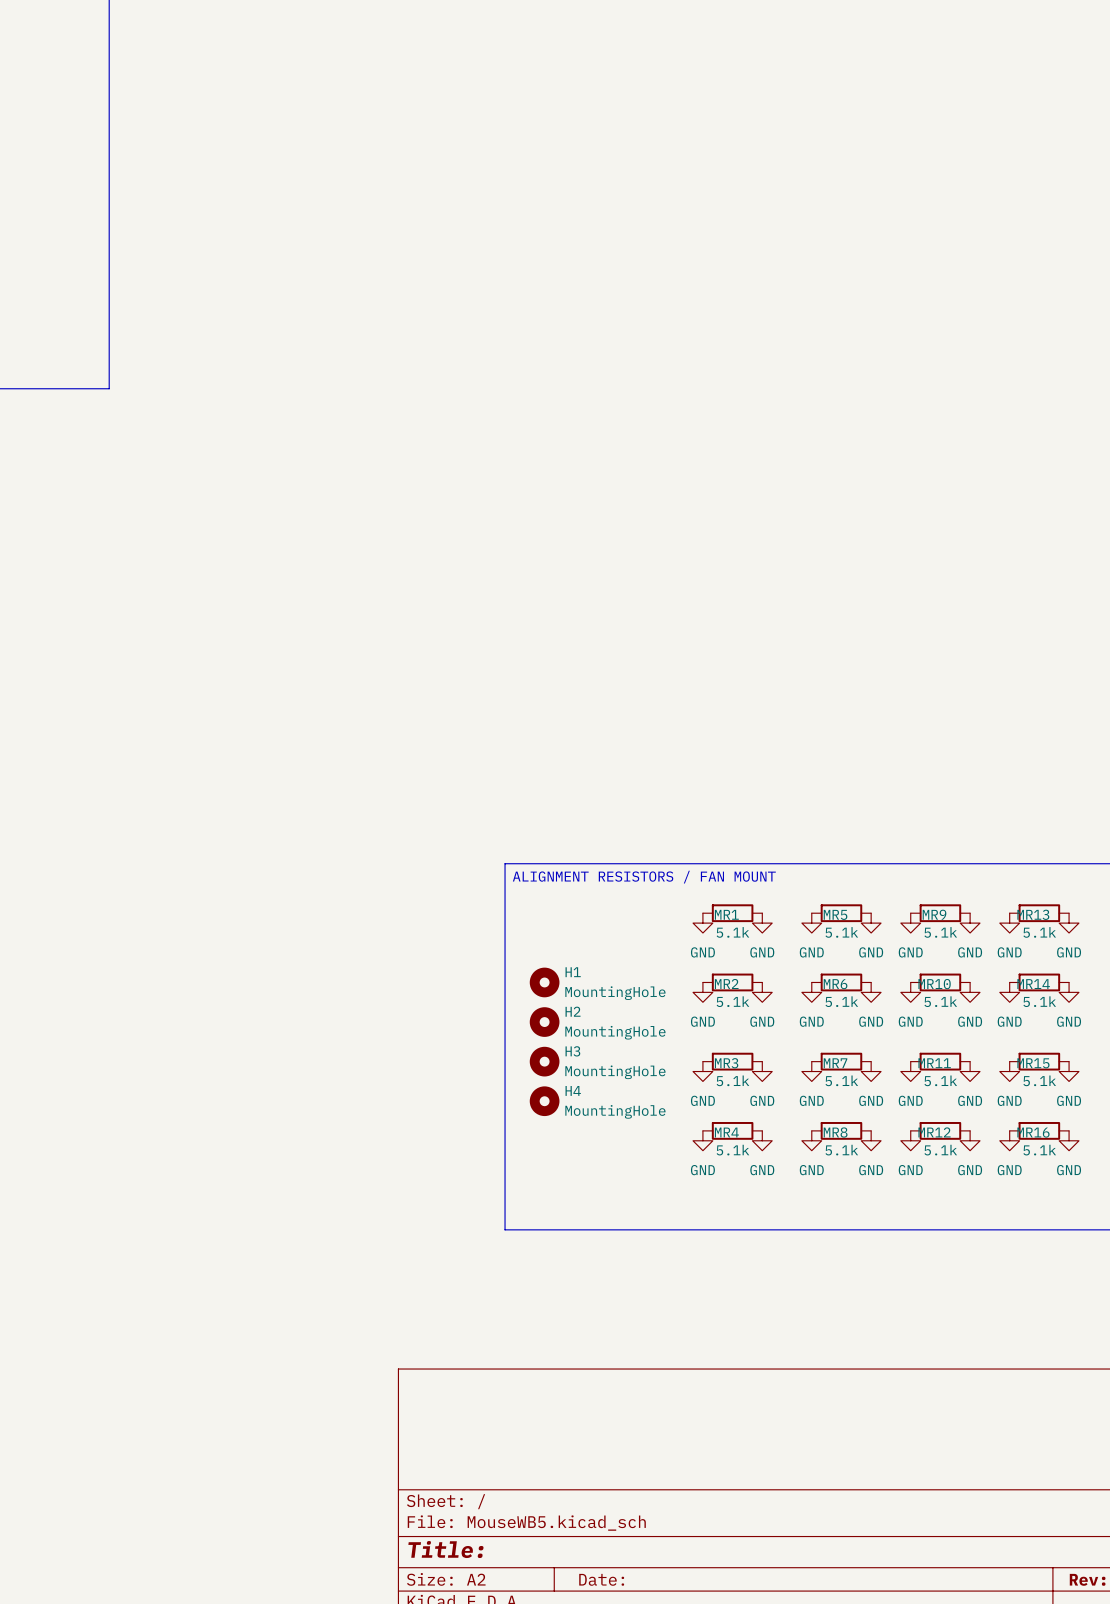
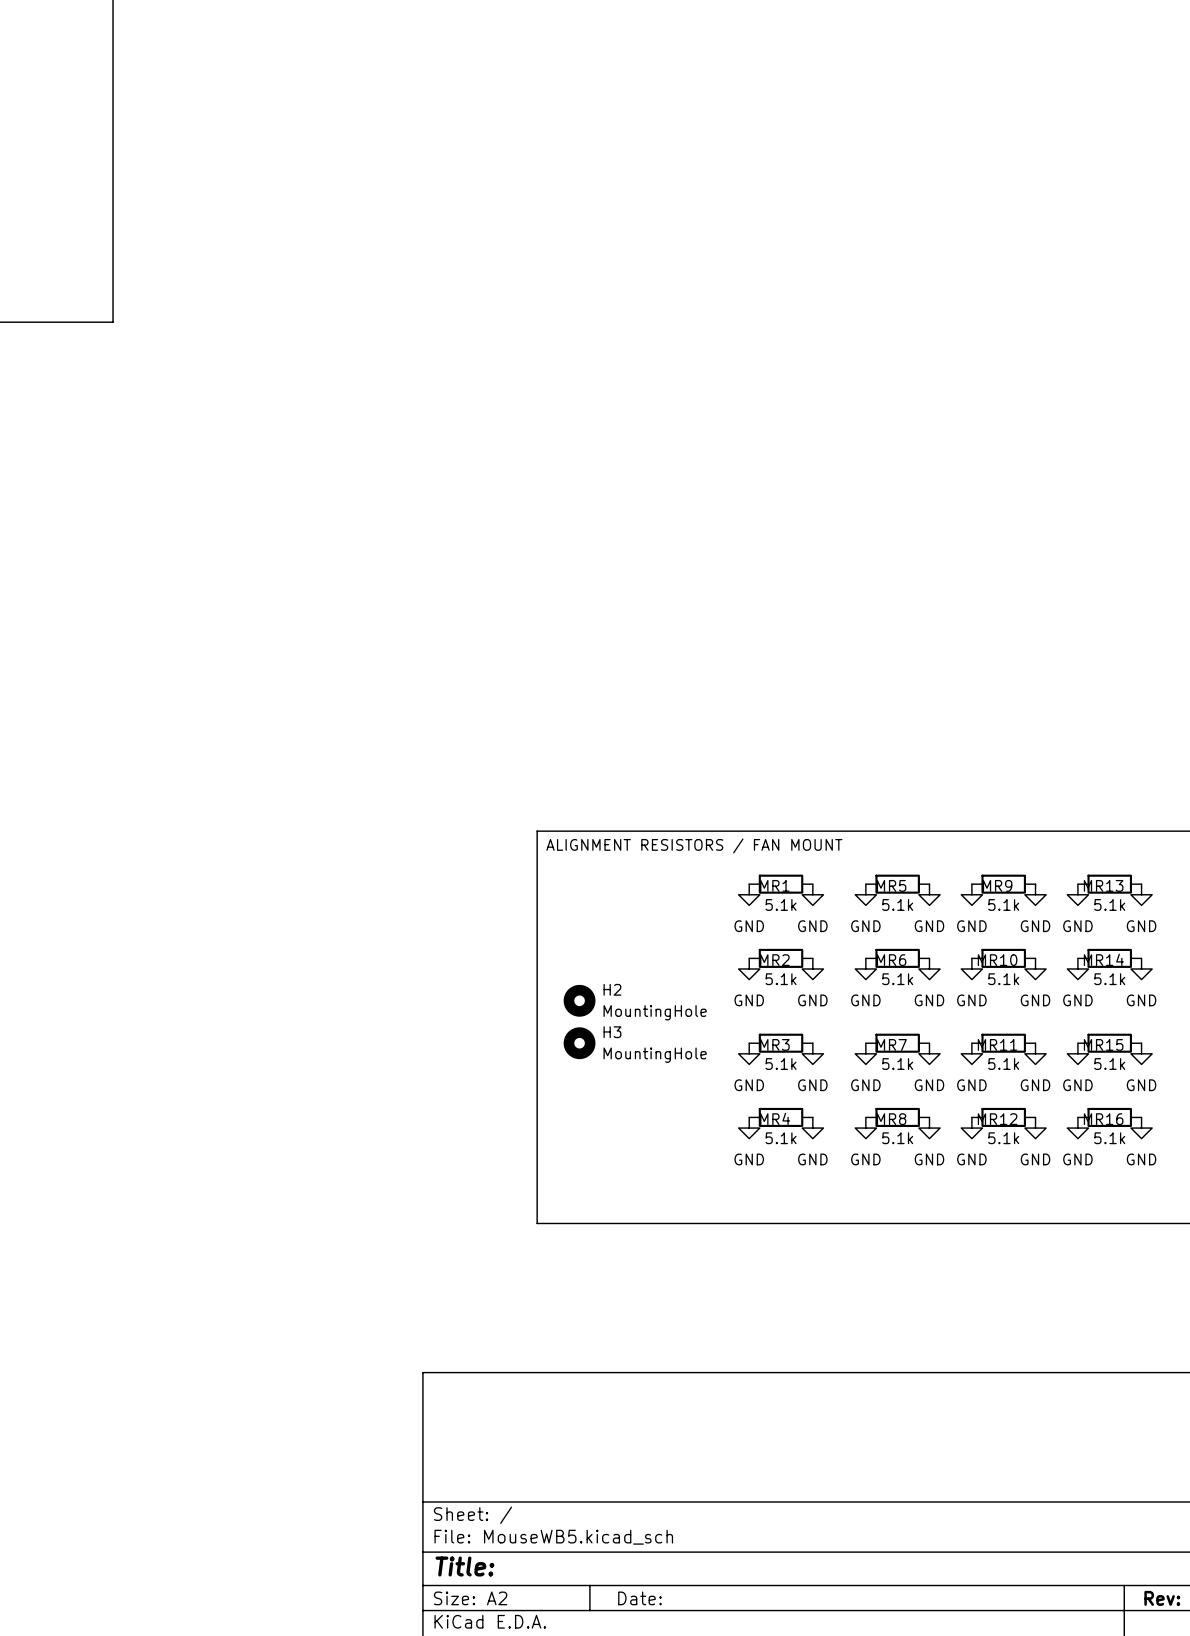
H1: MountingHole (544, 982) -> none
H4: MountingHole (544, 1101) -> none

